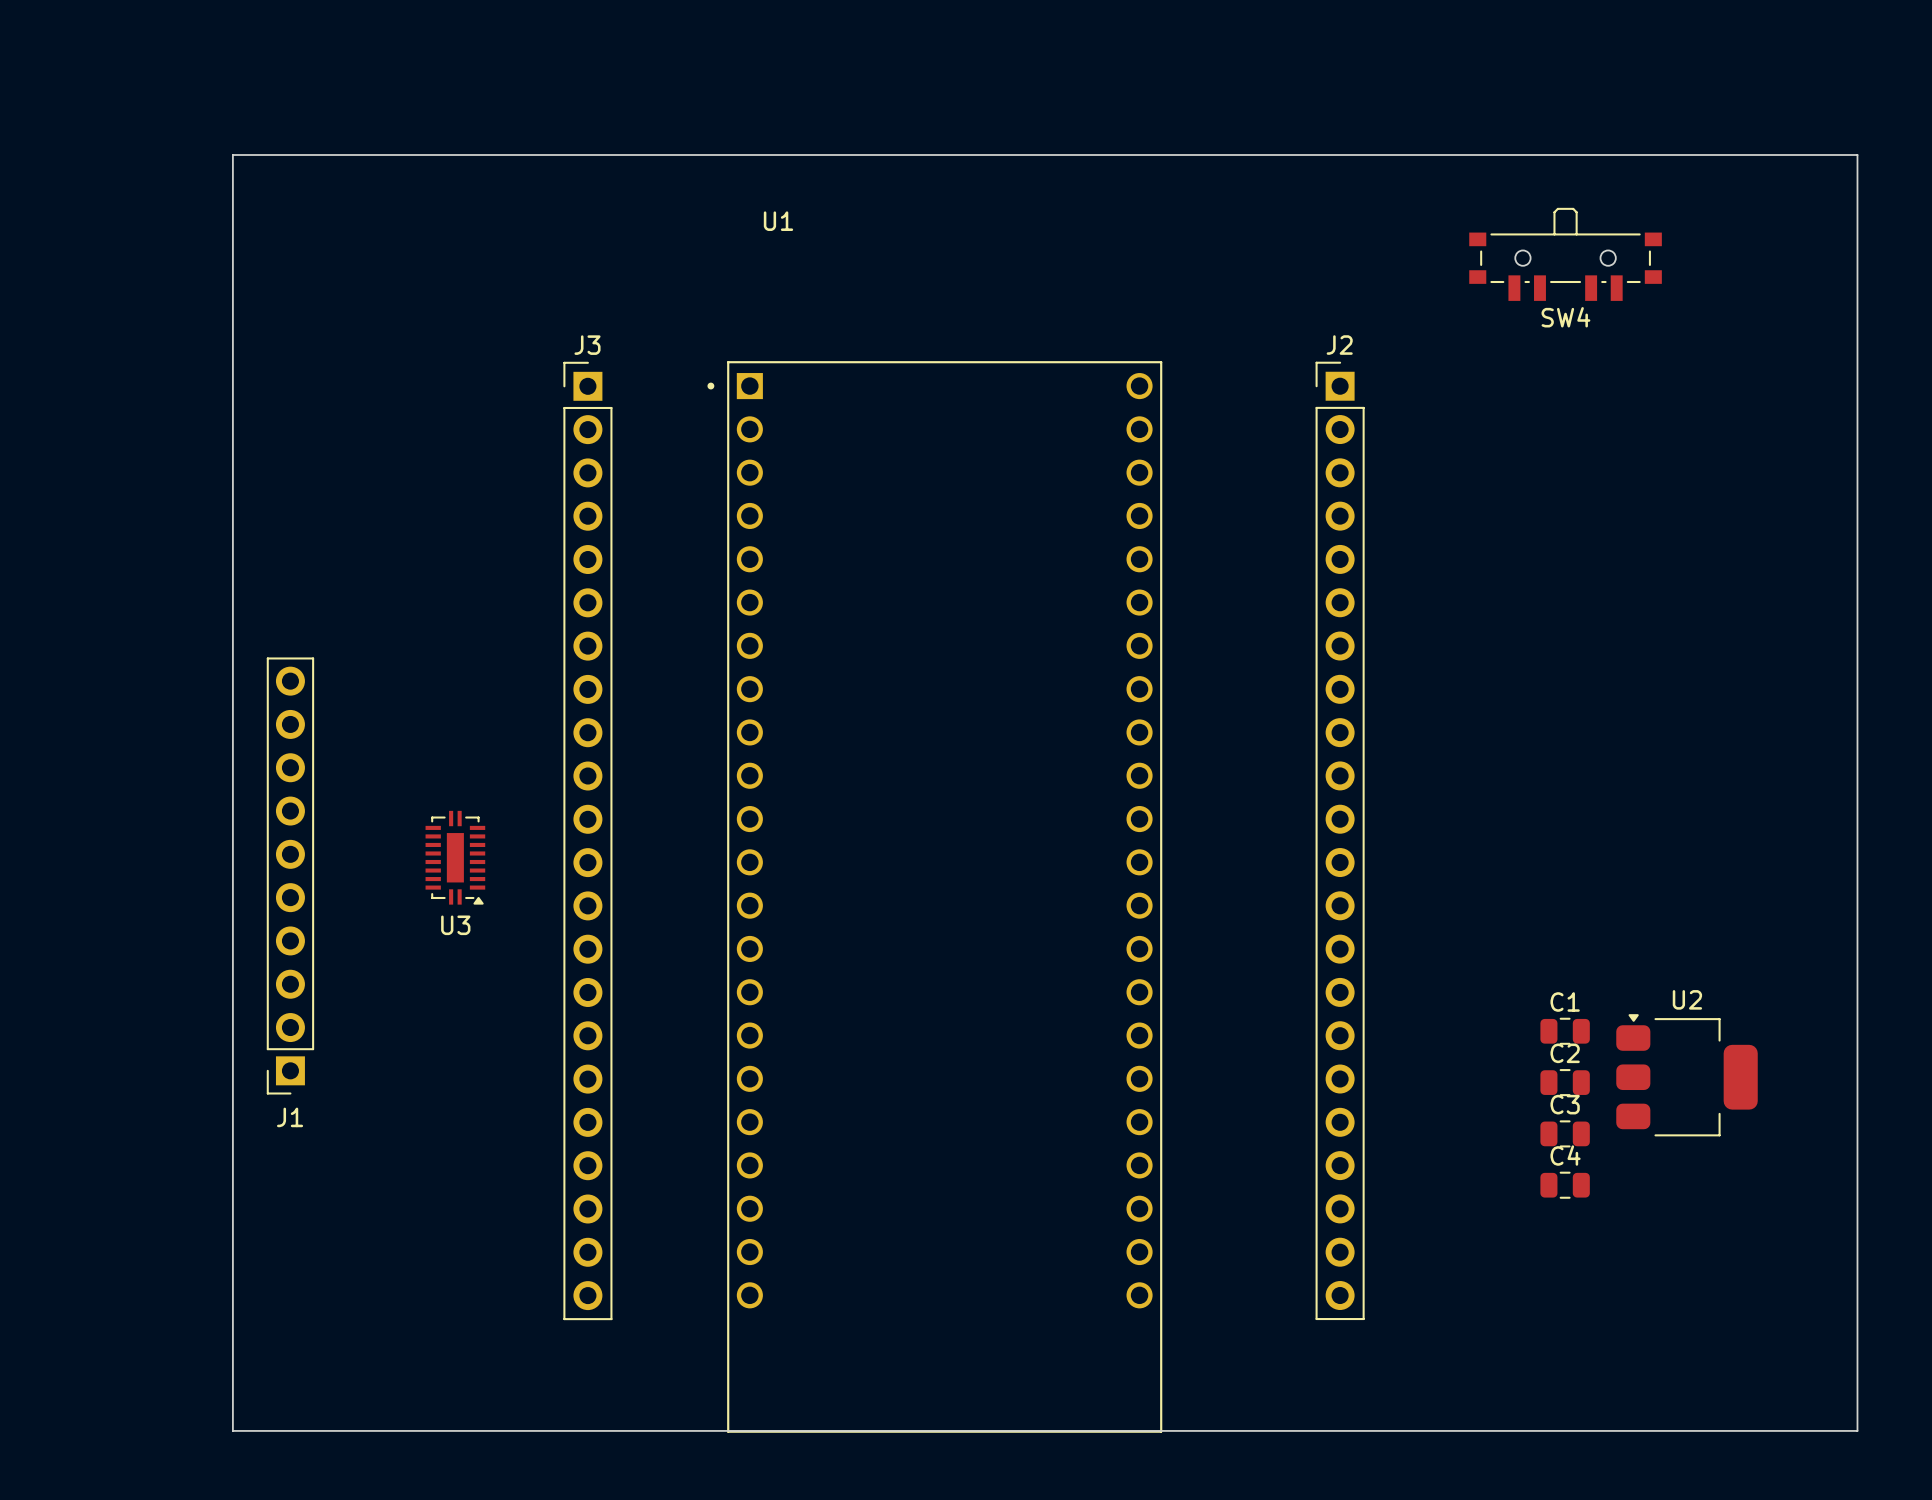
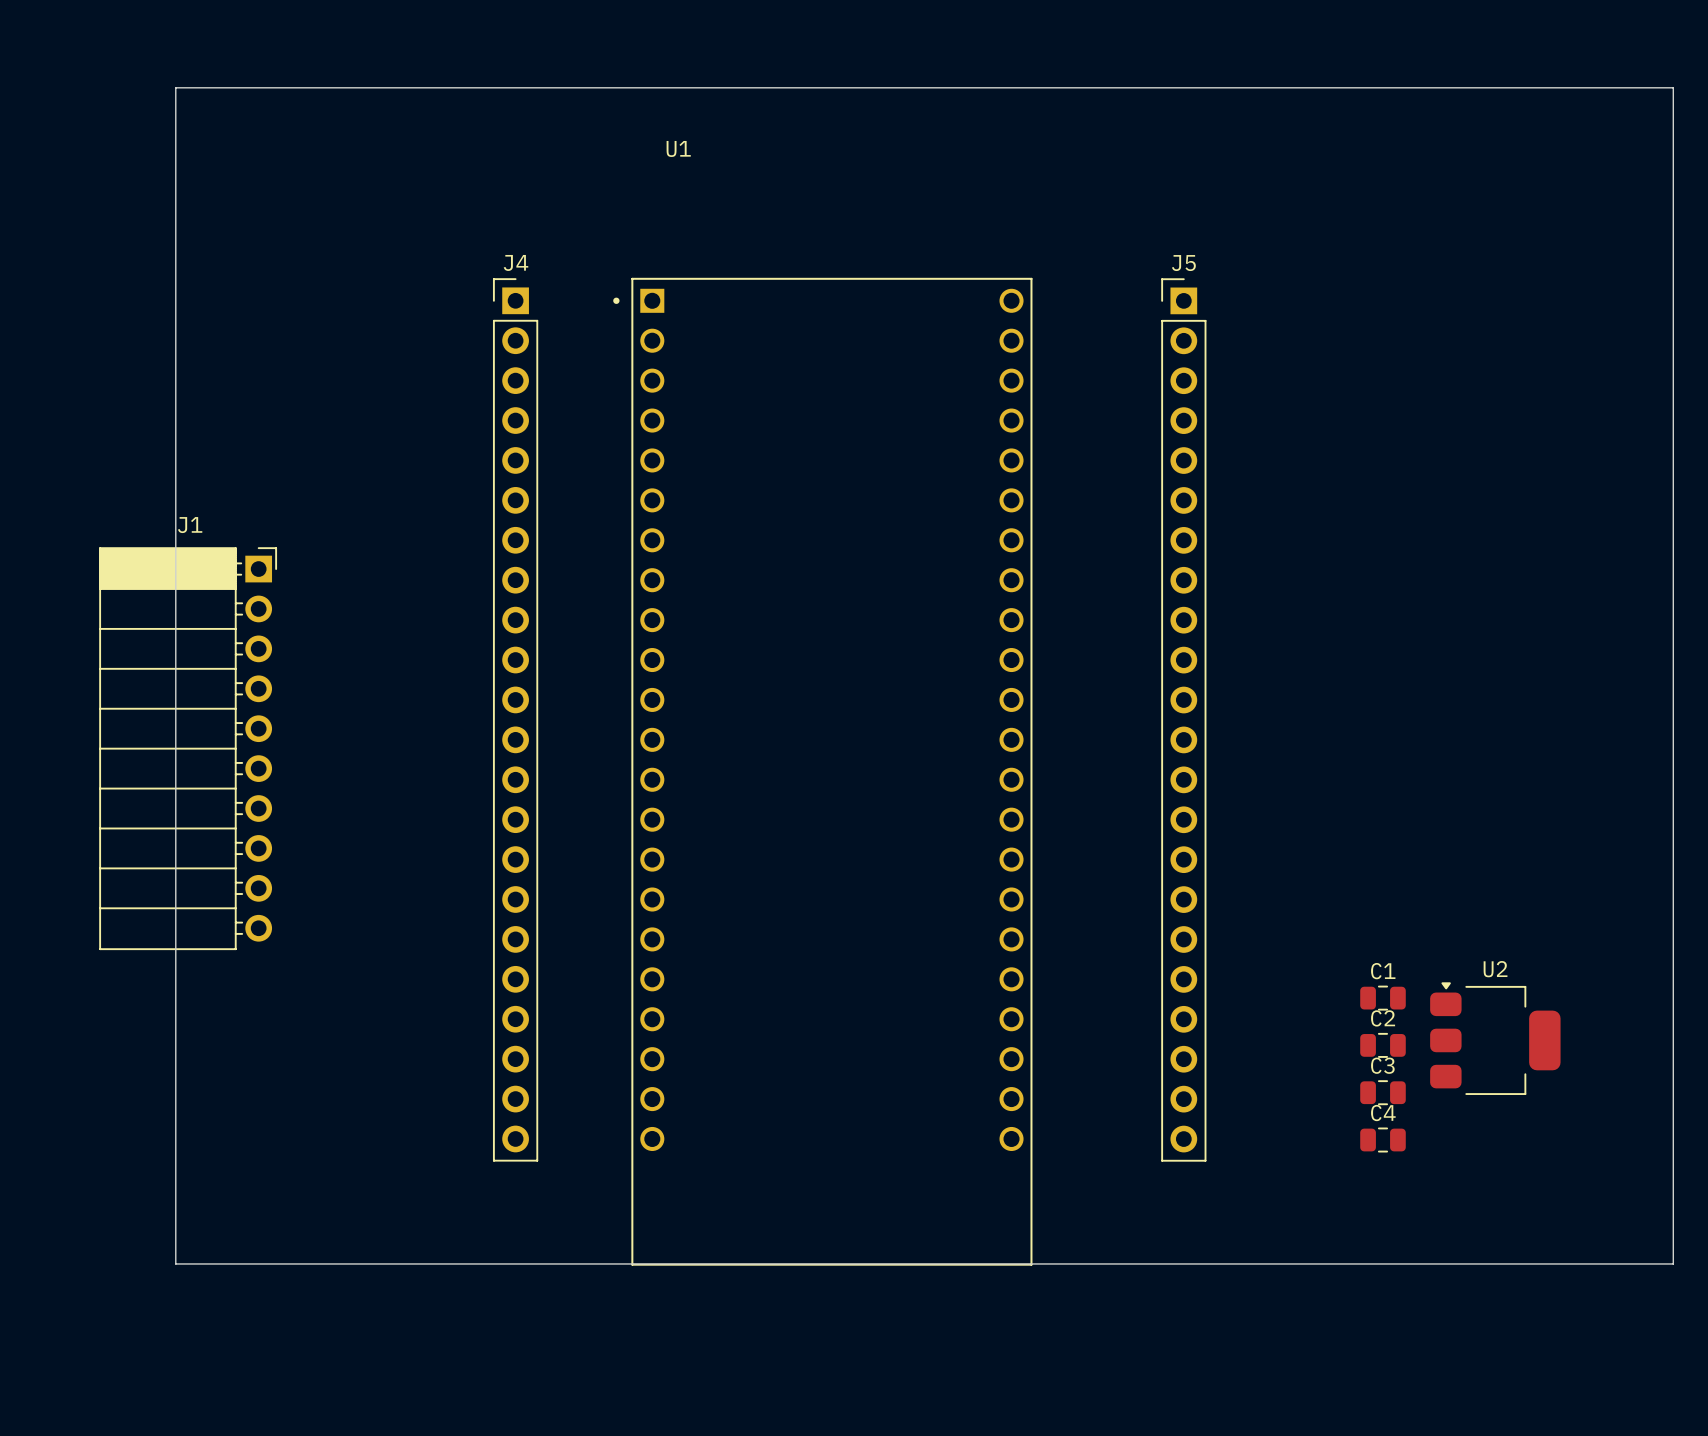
board edge: (232, 154) (1857, 154) (1857, 1430) (232, 1430) (232, 154) -> (175, 87) (175, 1263) (1673, 1263) (1673, 87) (175, 87)
SW4: (1565, 254) -> none
J1 footprint: [266, 657, 315, 1095] -> [99, 547, 278, 951]
J4: none -> (515, 719)
J5: none -> (1183, 719)
J3: (587, 840) -> none
J2: (1340, 840) -> none
U3: (455, 857) -> none
U1 position: (934, 896) -> (822, 771)
J1 name position: J1 (290, 1117) -> J1 (190, 525)

